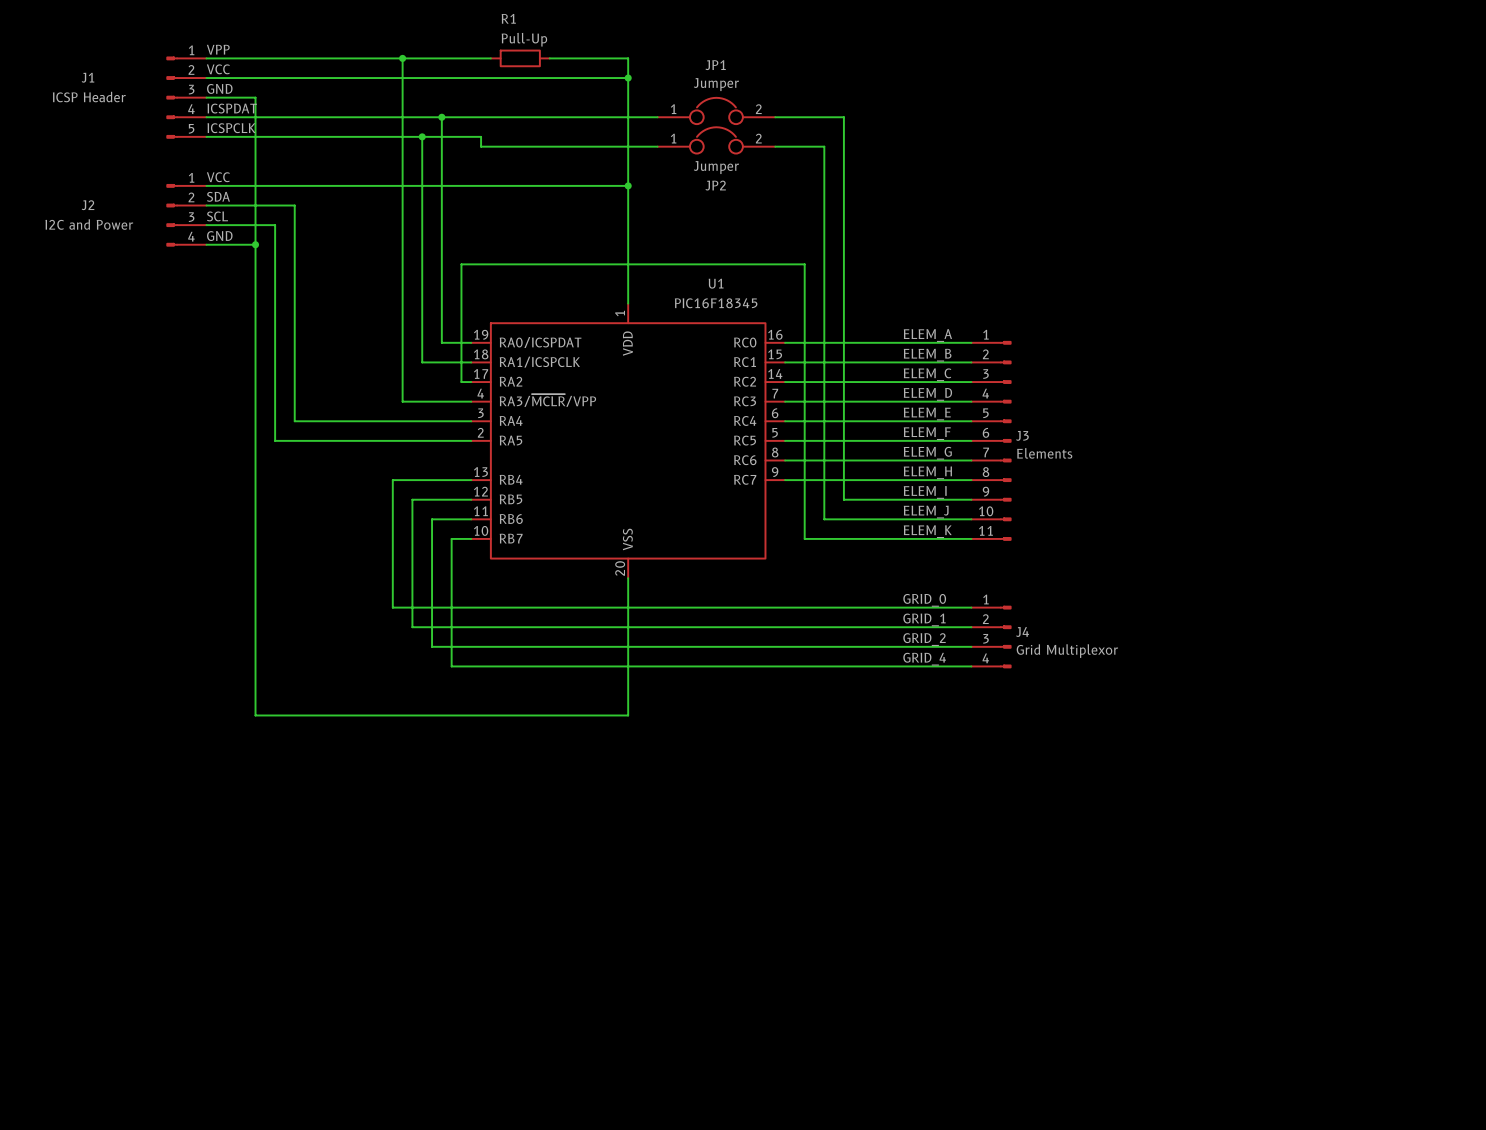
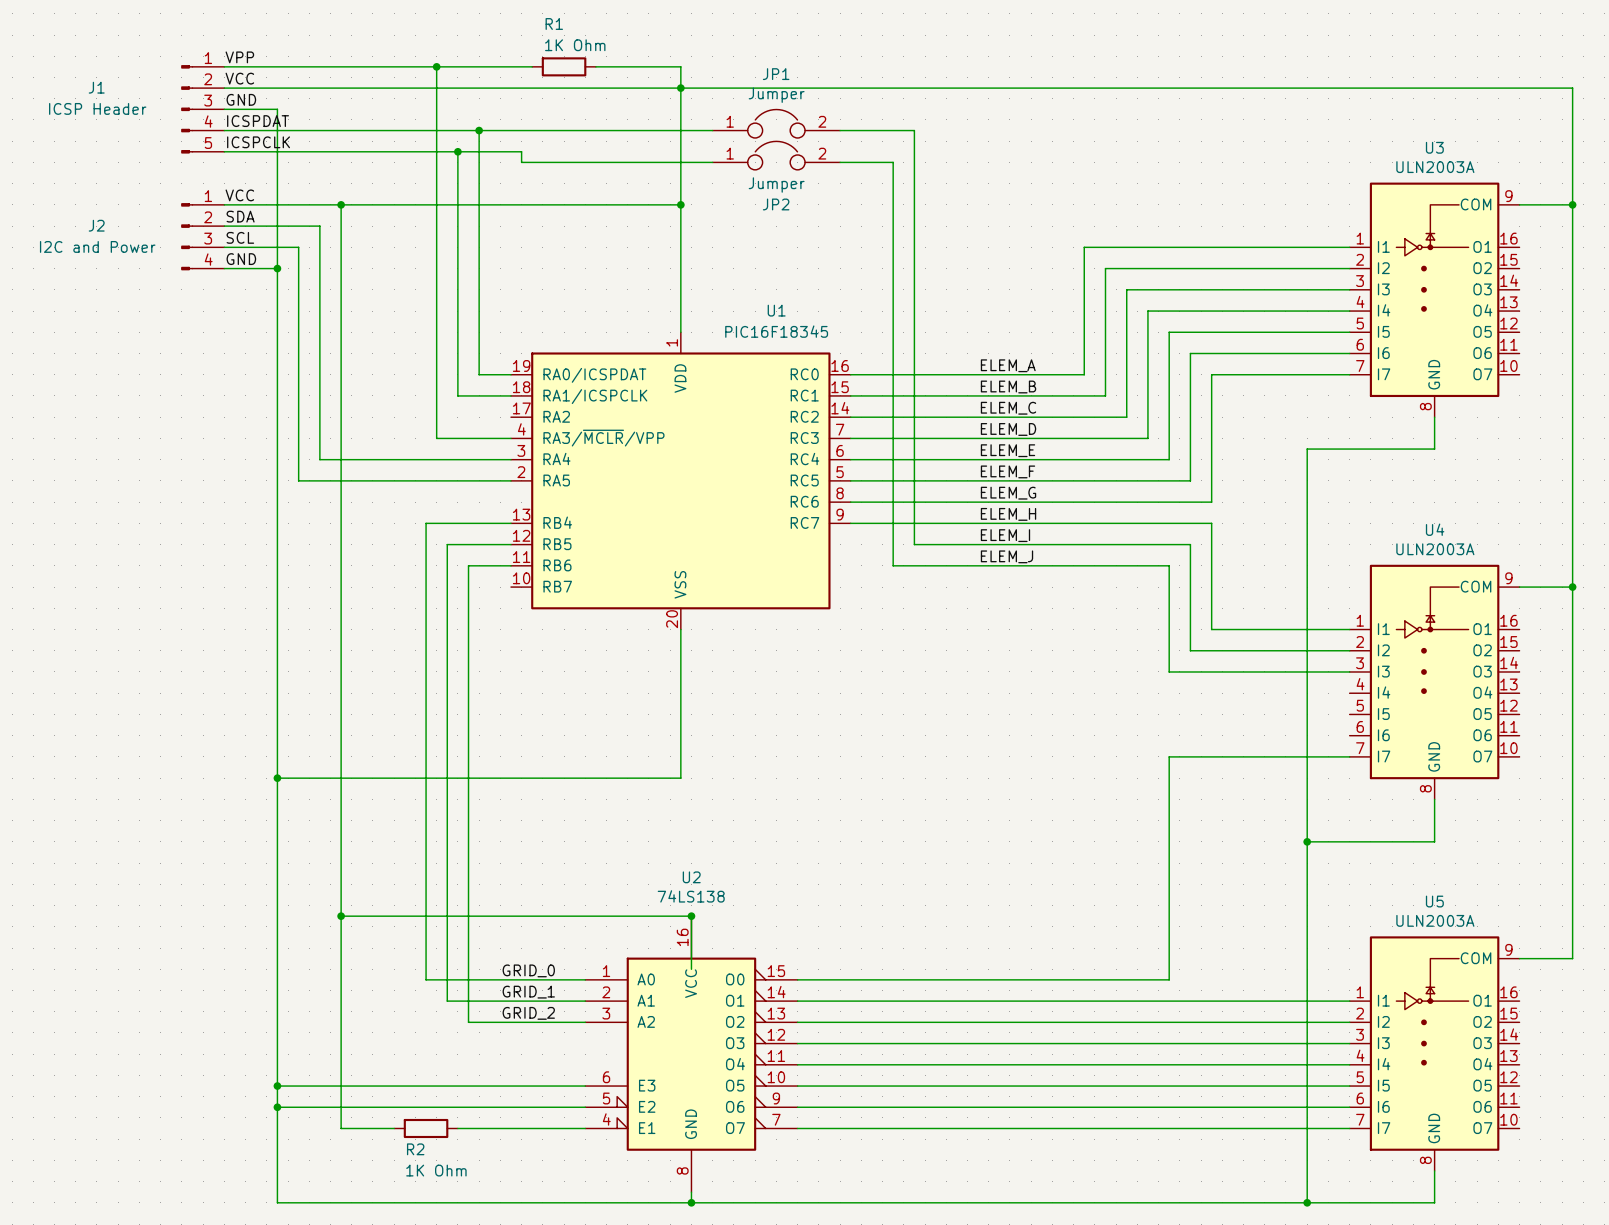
R1 value: Pull-Up (524, 39) -> 1K Ohm (575, 45)
wire: none -> (680, 88) (1572, 88) (1572, 958) (1519, 958)
wire: none -> (341, 204) (341, 1128) (394, 1128)
junction: none -> (341, 204)
wire: none -> (1519, 204) (1572, 204)
junction: none -> (1572, 204)
wire: none -> (1349, 247) (1084, 247) (1084, 374) (1052, 374)
wire: none -> (1349, 268) (1105, 268) (1105, 395) (1052, 395)
wire: none -> (1349, 289) (1126, 289) (1126, 417) (1052, 417)
U3: none -> ULN2003A (1434, 299)
wire: none -> (1349, 311) (1147, 311) (1147, 438) (1052, 438)
wire: none -> (1349, 332) (1169, 332) (1169, 459) (1052, 459)
wire: none -> (1349, 353) (1190, 353) (1190, 480) (1052, 480)
wire: none -> (1349, 374) (1211, 374) (1211, 502) (1052, 502)
wire: (471, 382) (461, 382) (461, 264) (804, 264) (804, 538) (971, 538) -> none
wire: none -> (1434, 417) (1434, 449) (1307, 449) (1307, 1202)
J3: Elements (991, 440) -> none
wire: none -> (1052, 523) (1211, 523) (1211, 629) (1349, 629)
wire: none -> (1052, 544) (1190, 544) (1190, 650) (1349, 650)
wire: none -> (1052, 565) (1169, 565) (1169, 671) (1349, 671)
label: ELEM_K (927, 531) -> none
wire: (471, 538) (451, 538) (451, 666) (971, 666) -> none
wire: none -> (1519, 587) (1572, 587)
junction: none -> (1572, 587)
label: GRID_0 (924, 600) -> none
wire: (392, 607) (971, 607) -> (426, 661) (426, 979) (585, 979)
label: GRID_1 (924, 619) -> none
U4: none -> ULN2003A (1434, 682)
wire: (412, 627) (971, 627) -> (447, 682) (447, 1001) (585, 1001)
J4: Grid Multiplexor (991, 637) -> none
label: GRID_2 (924, 639) -> none
wire: (432, 646) (971, 646) -> (468, 703) (468, 1022) (585, 1022)
label: GRID_4 (924, 659) -> none
wire: none -> (1349, 756) (1169, 756) (1169, 979) (797, 979)
wire: none -> (277, 778) (277, 1202) (1434, 1202) (1434, 1170)
junction: none -> (277, 778)
wire: none -> (1434, 799) (1434, 841) (1307, 841)
junction: none -> (1307, 841)
wire: none -> (341, 916) (691, 916) (691, 969)
junction: none -> (341, 916)
junction: none -> (691, 916)
label: none -> GRID_0 (528, 970)
label: none -> GRID_1 (528, 992)
wire: none -> (797, 1001) (1349, 1001)
label: none -> GRID_2 (528, 1013)
wire: none -> (797, 1022) (1349, 1022)
wire: none -> (797, 1043) (1349, 1043)
U5: none -> ULN2003A (1434, 1053)
U2: none -> 74LS138 (691, 1054)
wire: none -> (797, 1064) (1349, 1064)
wire: none -> (277, 1086) (585, 1086)
junction: none -> (277, 1086)
wire: none -> (797, 1086) (1349, 1086)
wire: none -> (277, 1107) (585, 1107)
junction: none -> (277, 1107)
wire: none -> (797, 1107) (1349, 1107)
R2: none -> 1K Ohm (426, 1128)
wire: none -> (457, 1128) (585, 1128)
wire: none -> (797, 1128) (1349, 1128)
wire: none -> (691, 1192) (691, 1202)
junction: none -> (691, 1202)
junction: none -> (1307, 1202)

